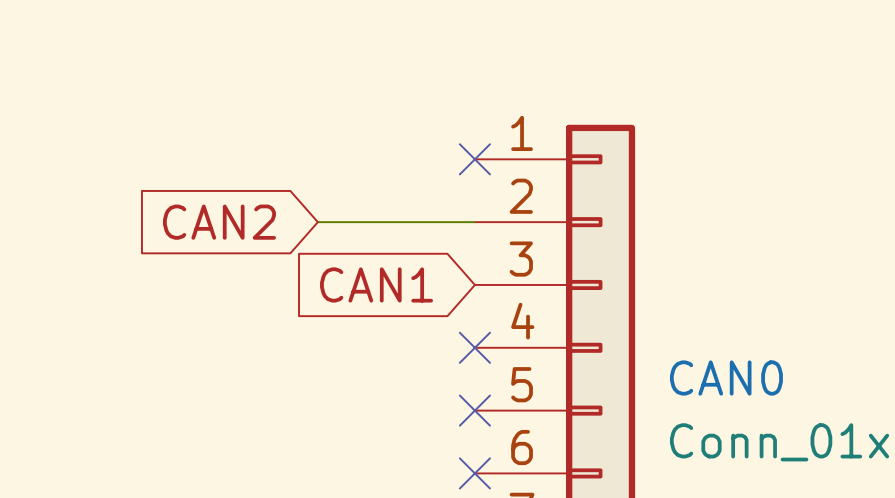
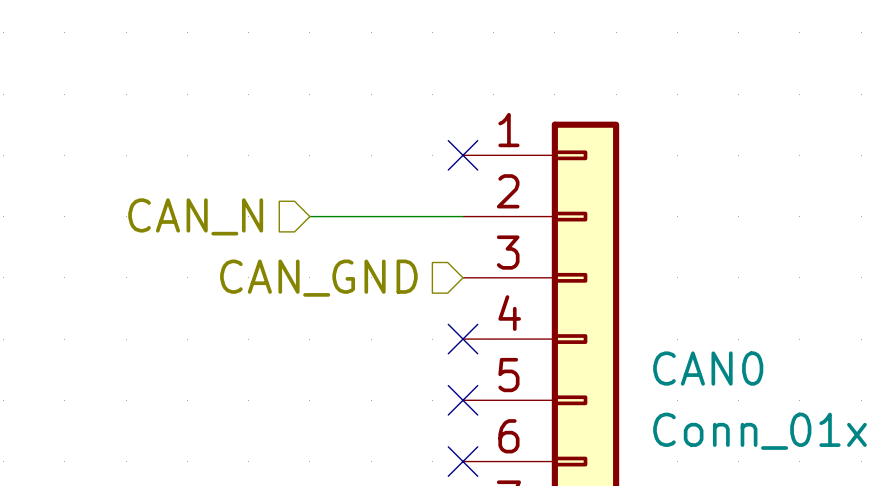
hierarchical label: none -> CAN_N (195, 216)
global label: CAN2 (219, 222) -> none
global label: CAN1 (376, 284) -> none
hierarchical label: none -> CAN_GND (318, 278)

